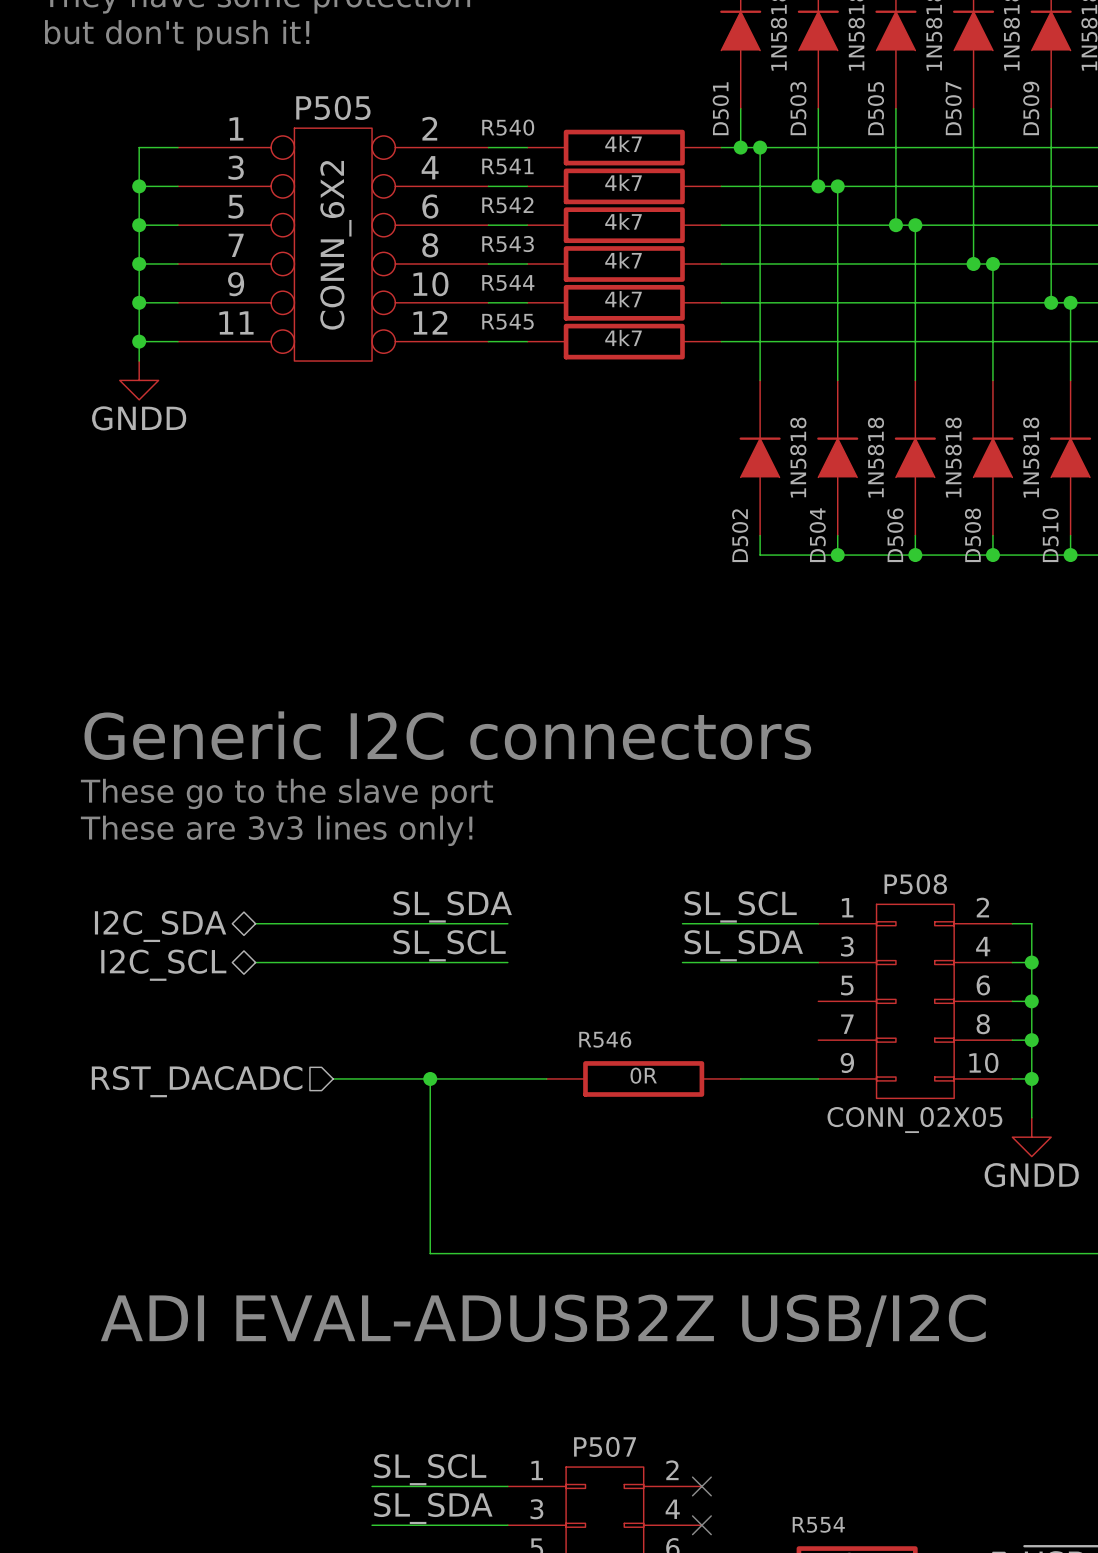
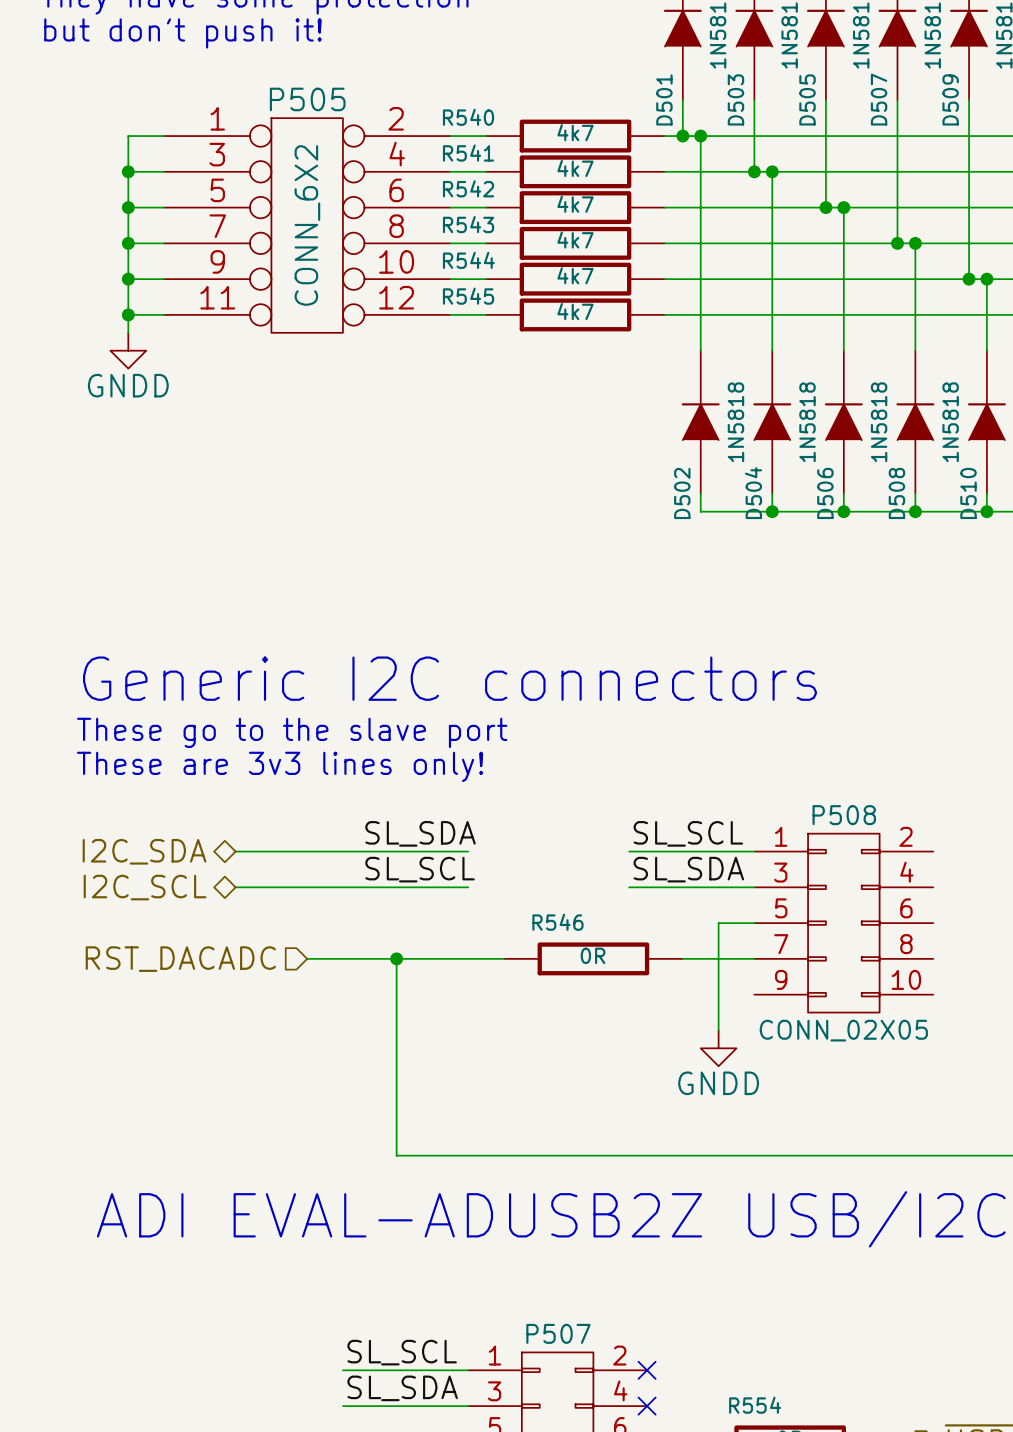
wire: (1012, 923) (1031, 923) (1031, 1117) -> none
wire: (1012, 962) (1031, 962) -> none
junction: (1031, 962) -> none
wire: none -> (754, 923) (718, 923) (718, 1030)
wire: (1012, 1001) (1031, 1001) -> none
junction: (1031, 1001) -> none
wire: none -> (396, 958) (396, 994)
wire: (1012, 1040) (1031, 1040) -> none
junction: (1031, 1040) -> none
wire: (333, 1078) (546, 1078) -> (307, 958) (503, 958)
junction position: (430, 1078) -> (396, 958)
R546 position: (643, 1078) -> (593, 958)
wire: (740, 1078) (818, 1078) -> (682, 958) (754, 958)
wire: (1012, 1078) (1031, 1078) -> none
junction: (1031, 1078) -> none
hierarchical label position: RST_DACADC (197, 1081) -> RST_DACADC (180, 959)
power symbol position: GNDD (1031, 1137) -> GNDD (718, 1048)

